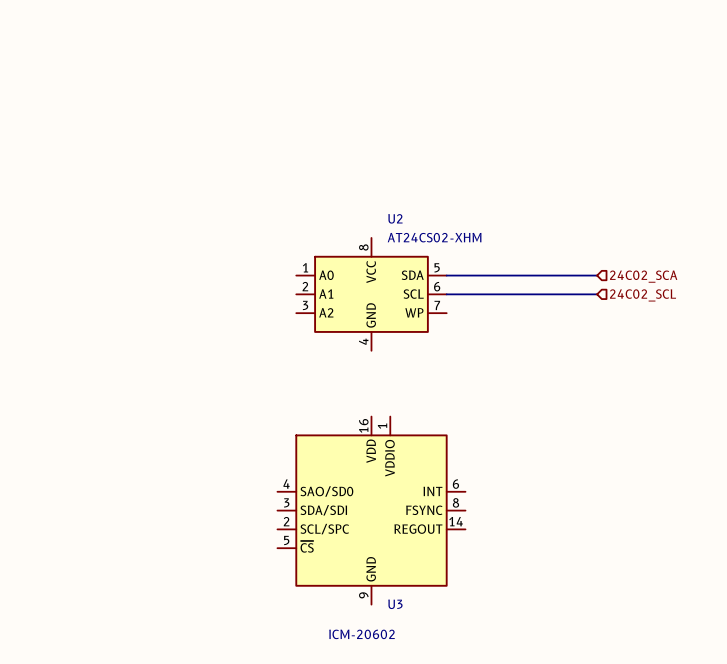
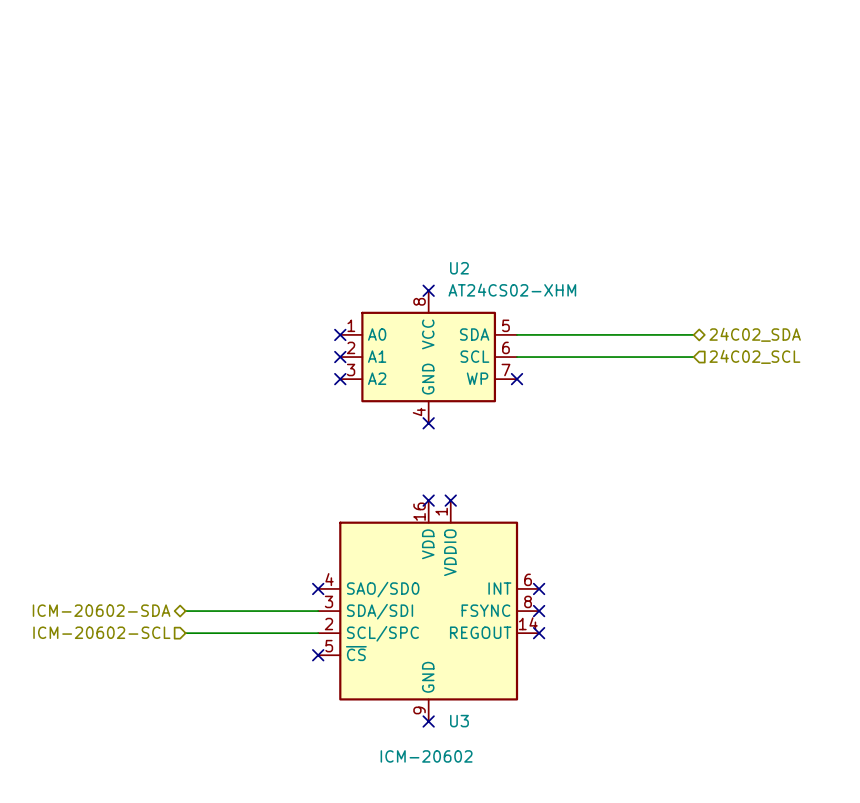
no-connect mark: none -> (428, 290)
no-connect mark: none -> (340, 334)
hierarchical label shape: input (643, 276) -> bidirectional (755, 334)
hierarchical label: 24C02_SCA (643, 276) -> 24C02_SDA (755, 334)
no-connect mark: none -> (340, 357)
no-connect mark: none -> (340, 379)
no-connect mark: none -> (517, 379)
no-connect mark: none -> (428, 423)
no-connect mark: none -> (428, 500)
no-connect mark: none -> (450, 500)
no-connect mark: none -> (318, 588)
no-connect mark: none -> (539, 588)
hierarchical label: none -> ICM-20602-SDA (101, 610)
wire: none -> (185, 611) (318, 611)
no-connect mark: none -> (539, 611)
hierarchical label: none -> ICM-20602-SCL (101, 632)
wire: none -> (185, 633) (318, 633)
no-connect mark: none -> (539, 633)
no-connect mark: none -> (318, 655)
no-connect mark: none -> (428, 721)

